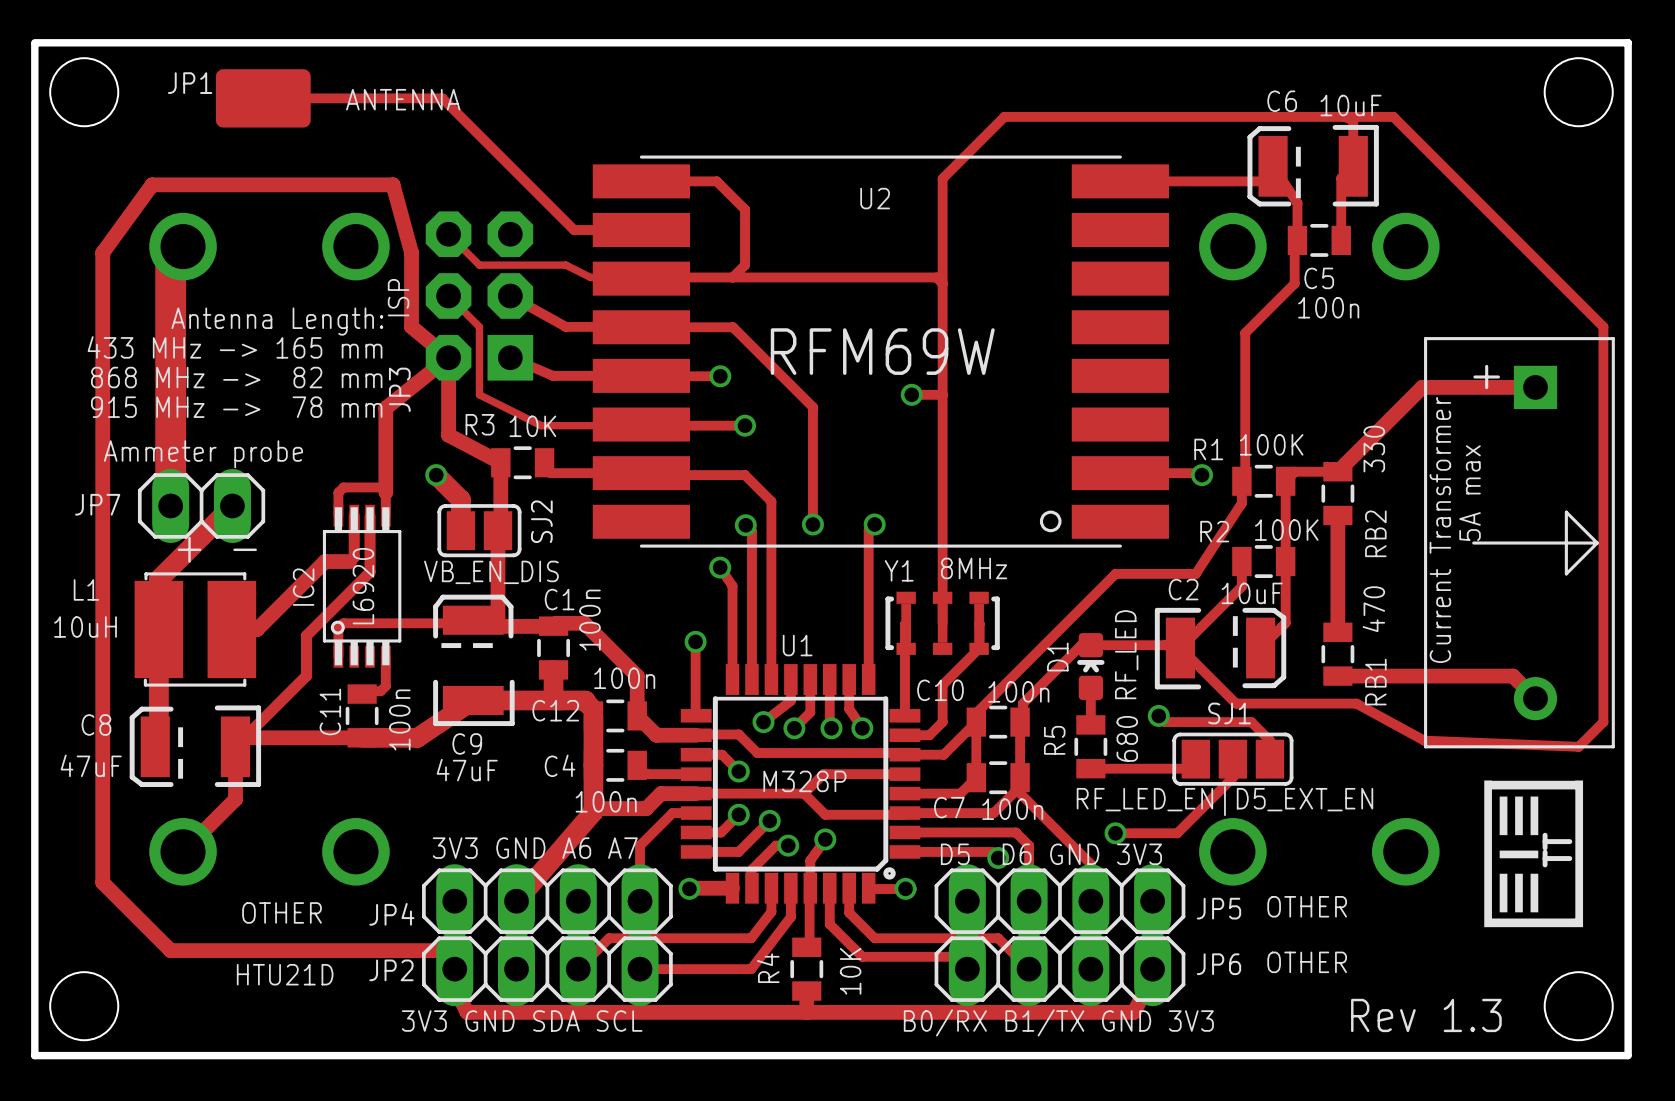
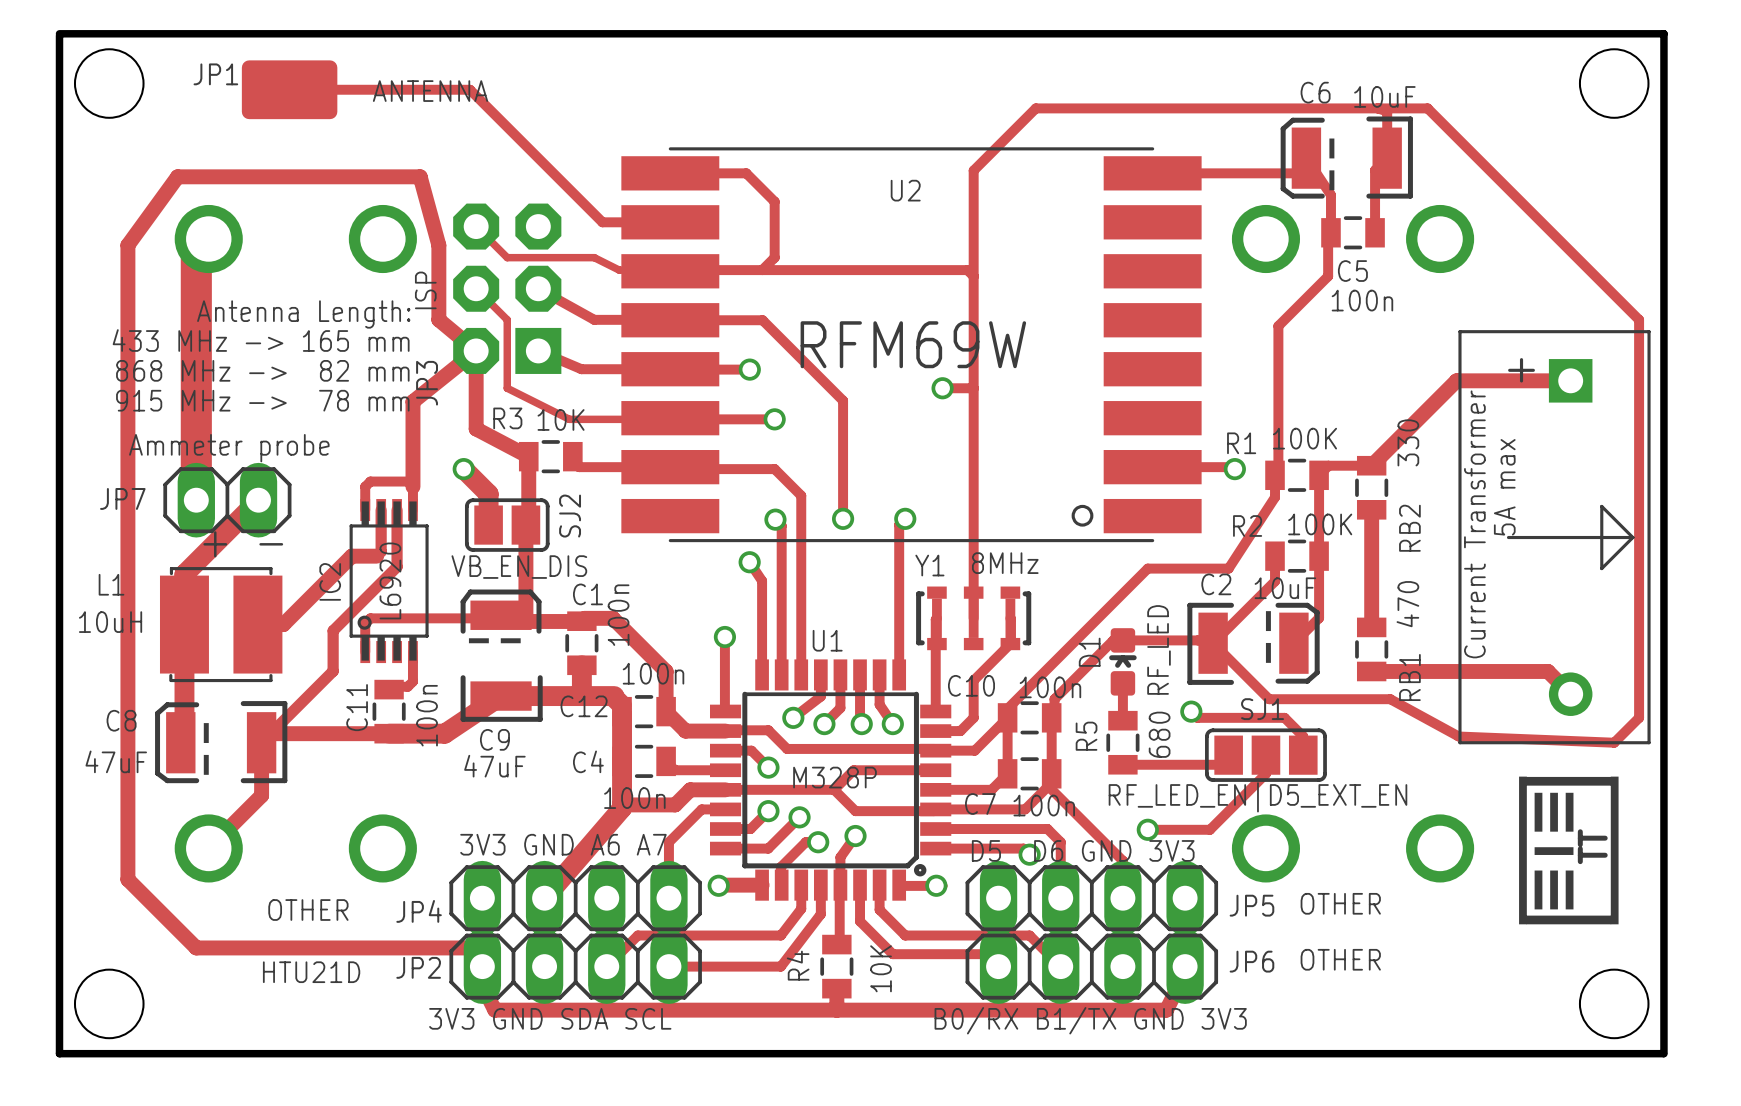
text: Rev 1.3 (1426, 1015) -> none

